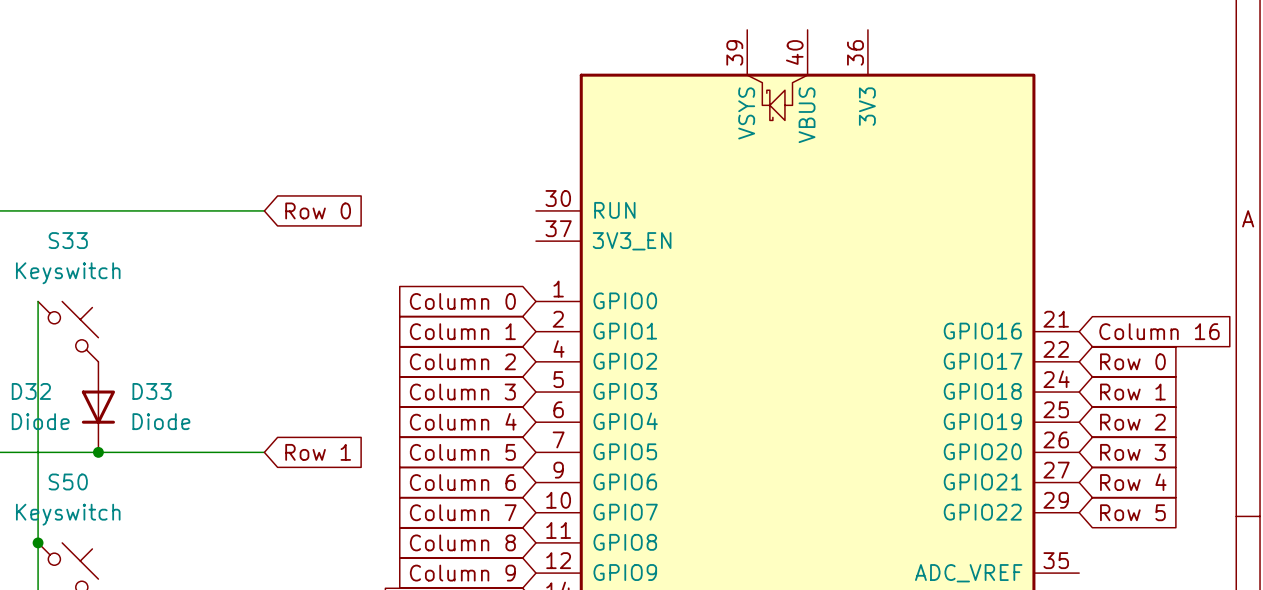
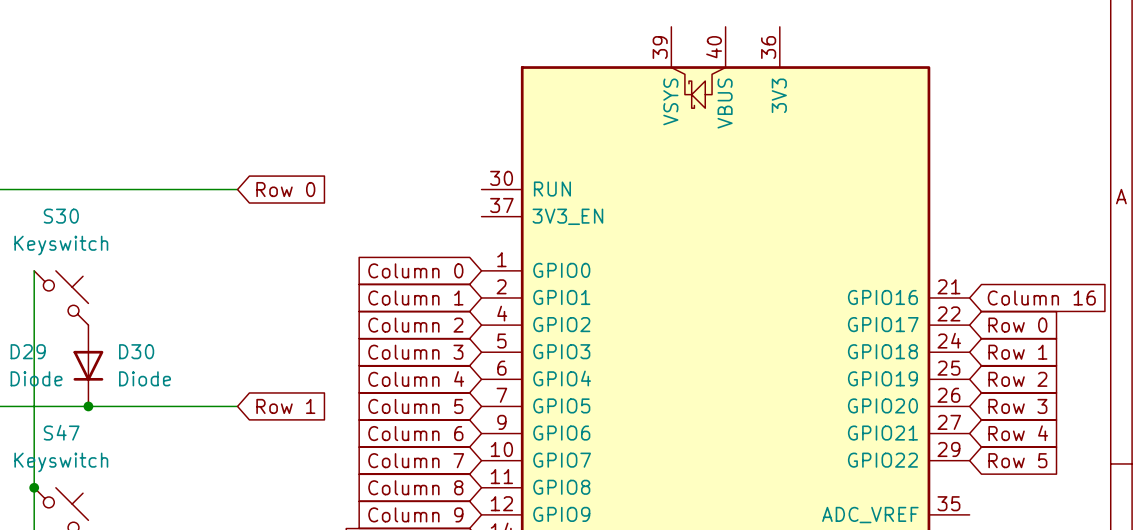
S33 name: S33 (68, 240) -> S30 (61, 216)
D32 name: D32 (31, 391) -> D29 (28, 351)
D33 name: D33 (152, 391) -> D30 (136, 351)
S50 name: S50 (68, 481) -> S47 (61, 432)

